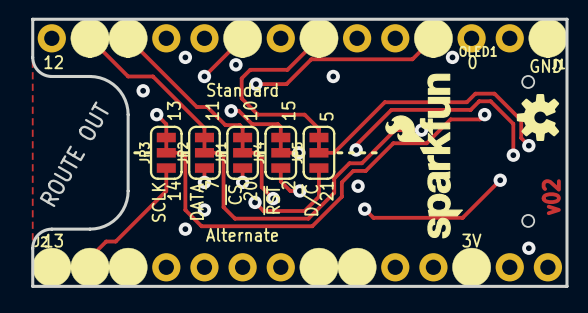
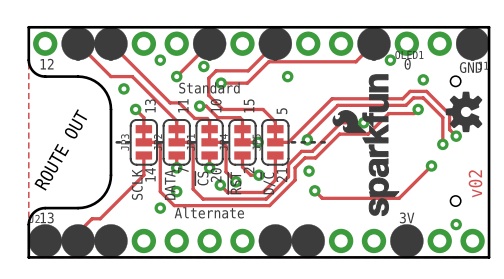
part: none -> (423, 79)

